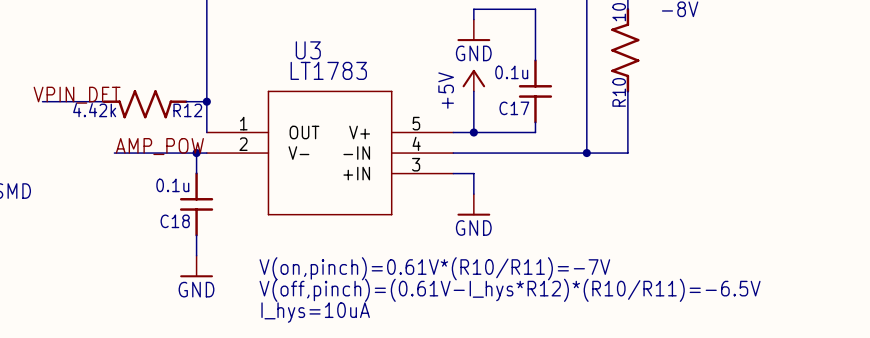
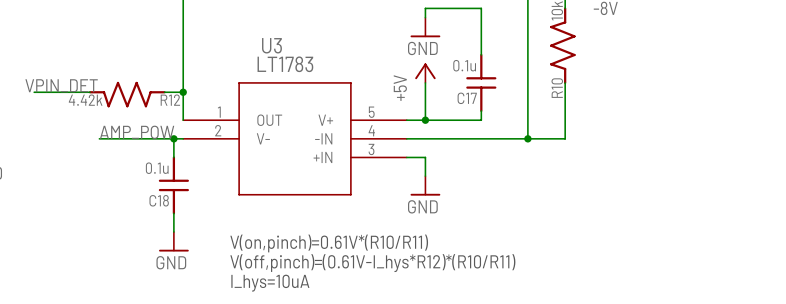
text: V(on,pinch)=0.61V*(R10/R11)=-7V (434, 268) -> V(on,pinch)=0.61V*(R10/R11) (329, 243)
text: V(off,pinch)=(0.61V-I_hys*R12)*(R10/R11)=-6.5V (510, 290) -> V(off,pinch)=(0.61V-I_hys*R12)*(R10/R11) (372, 263)

